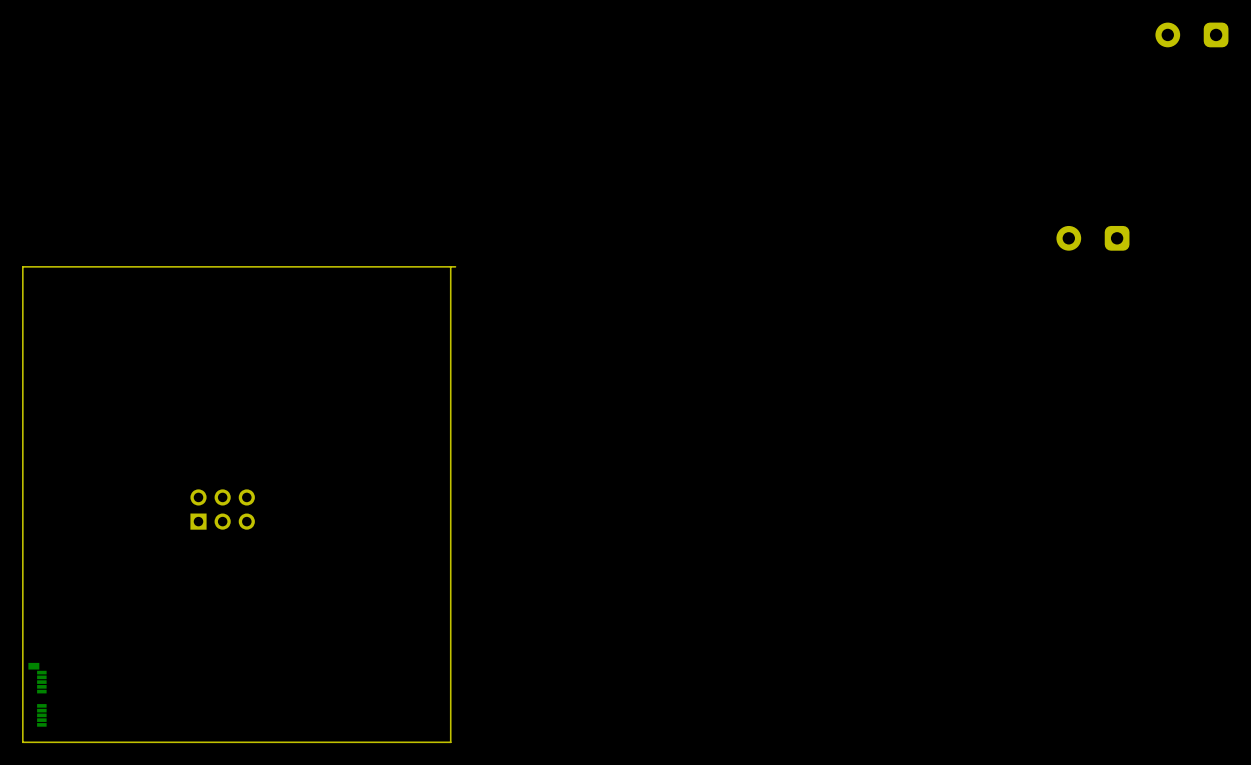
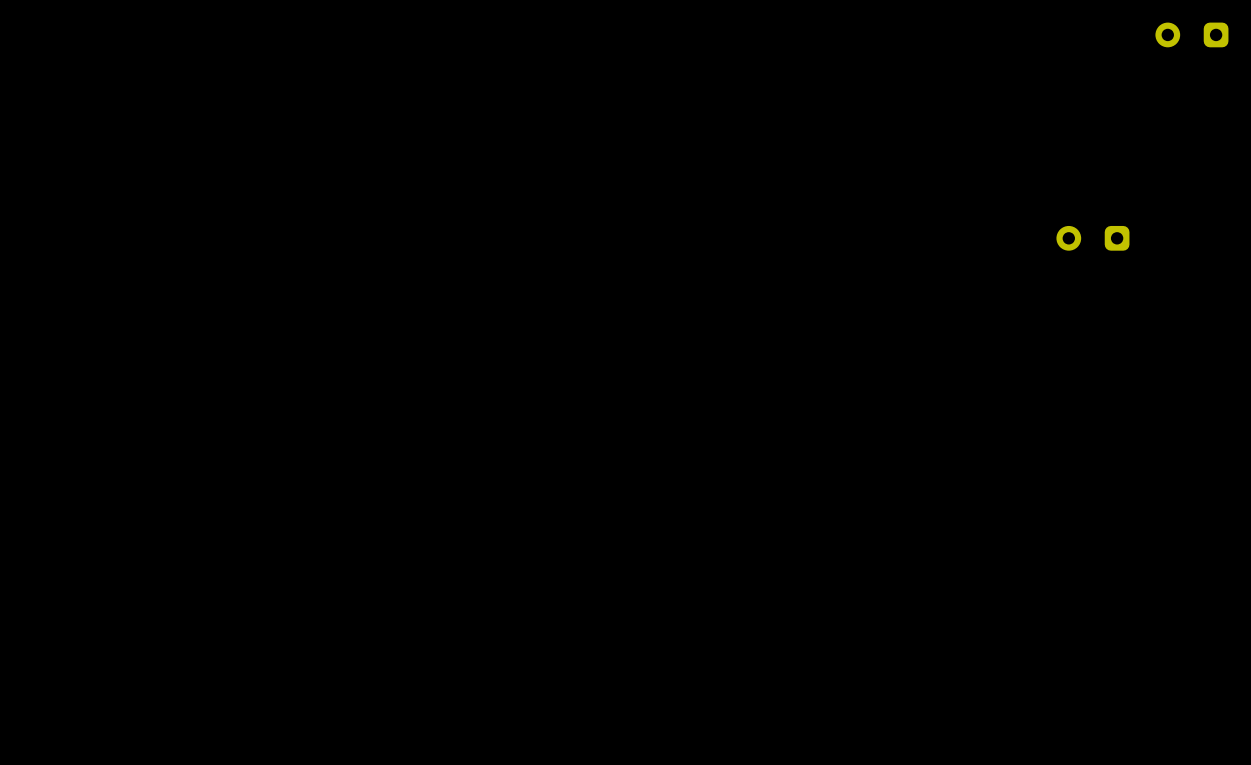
board edge: (455, 266) (22, 266) (22, 742) (450, 742) (450, 266) -> none
part: (222, 509) -> none
part: (37, 694) -> none

